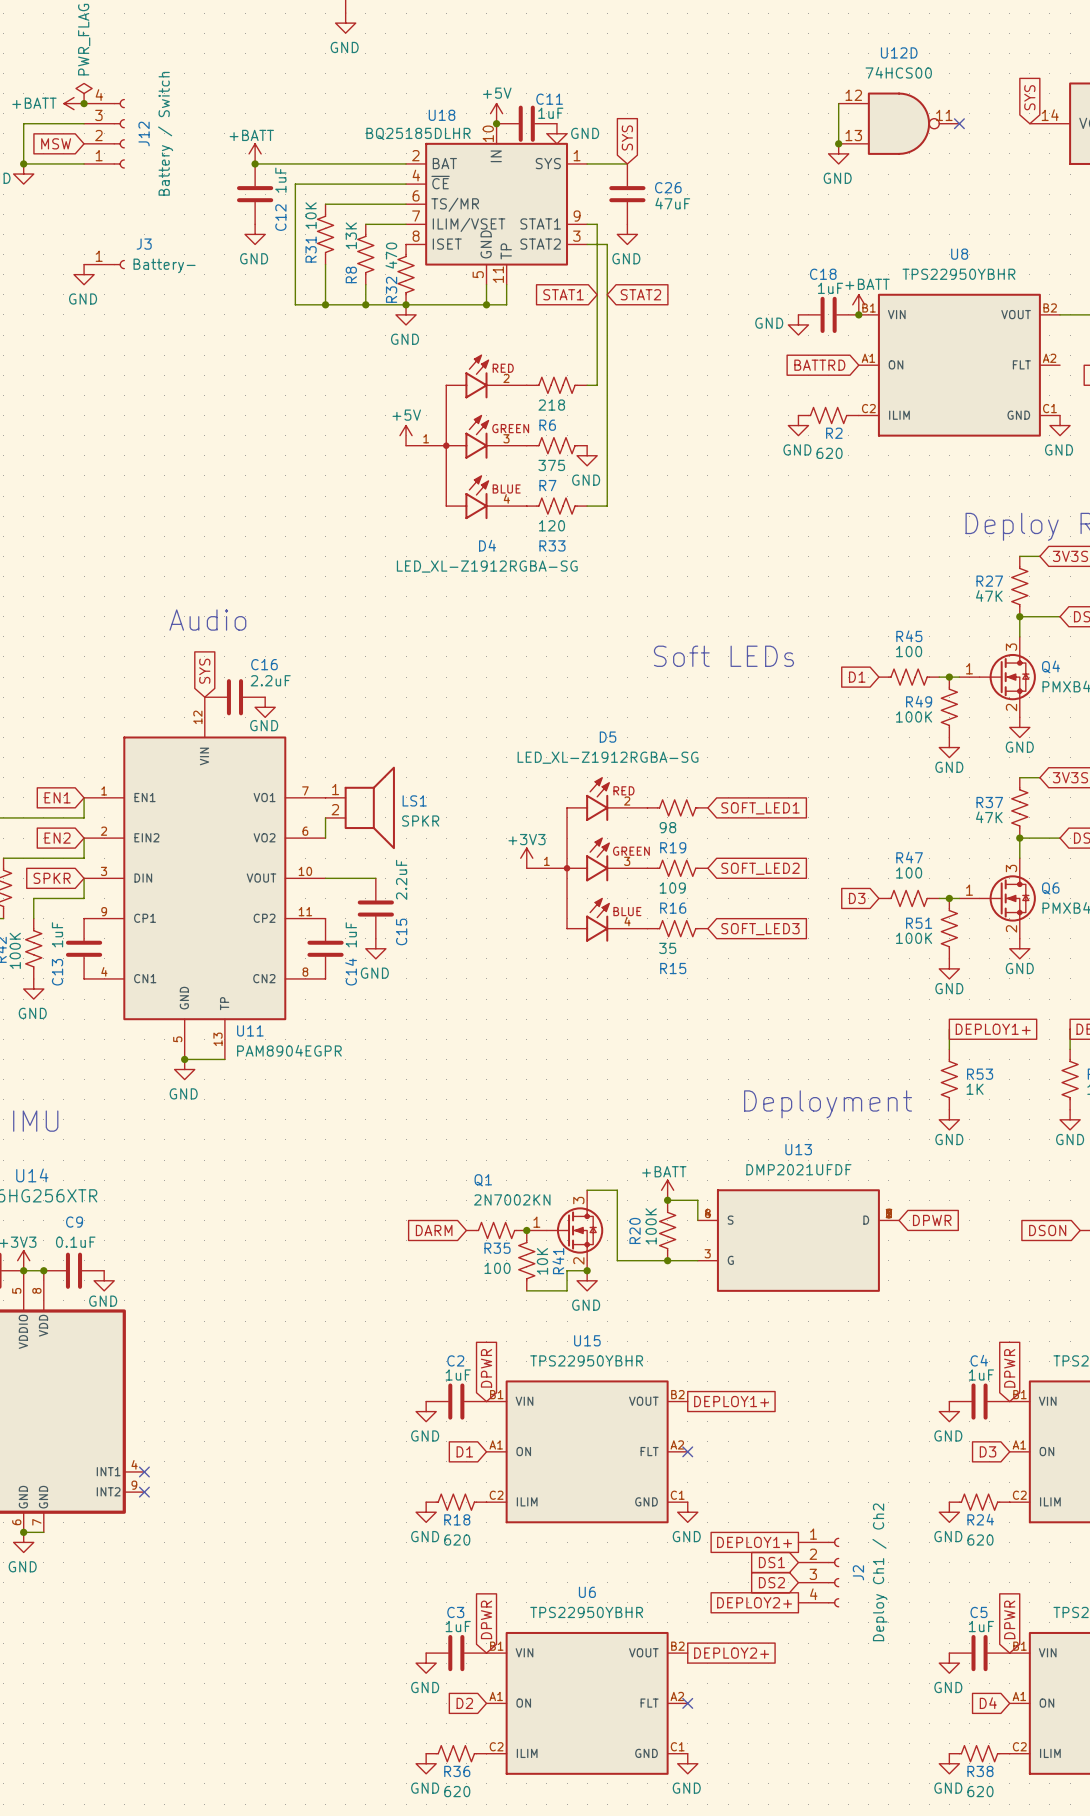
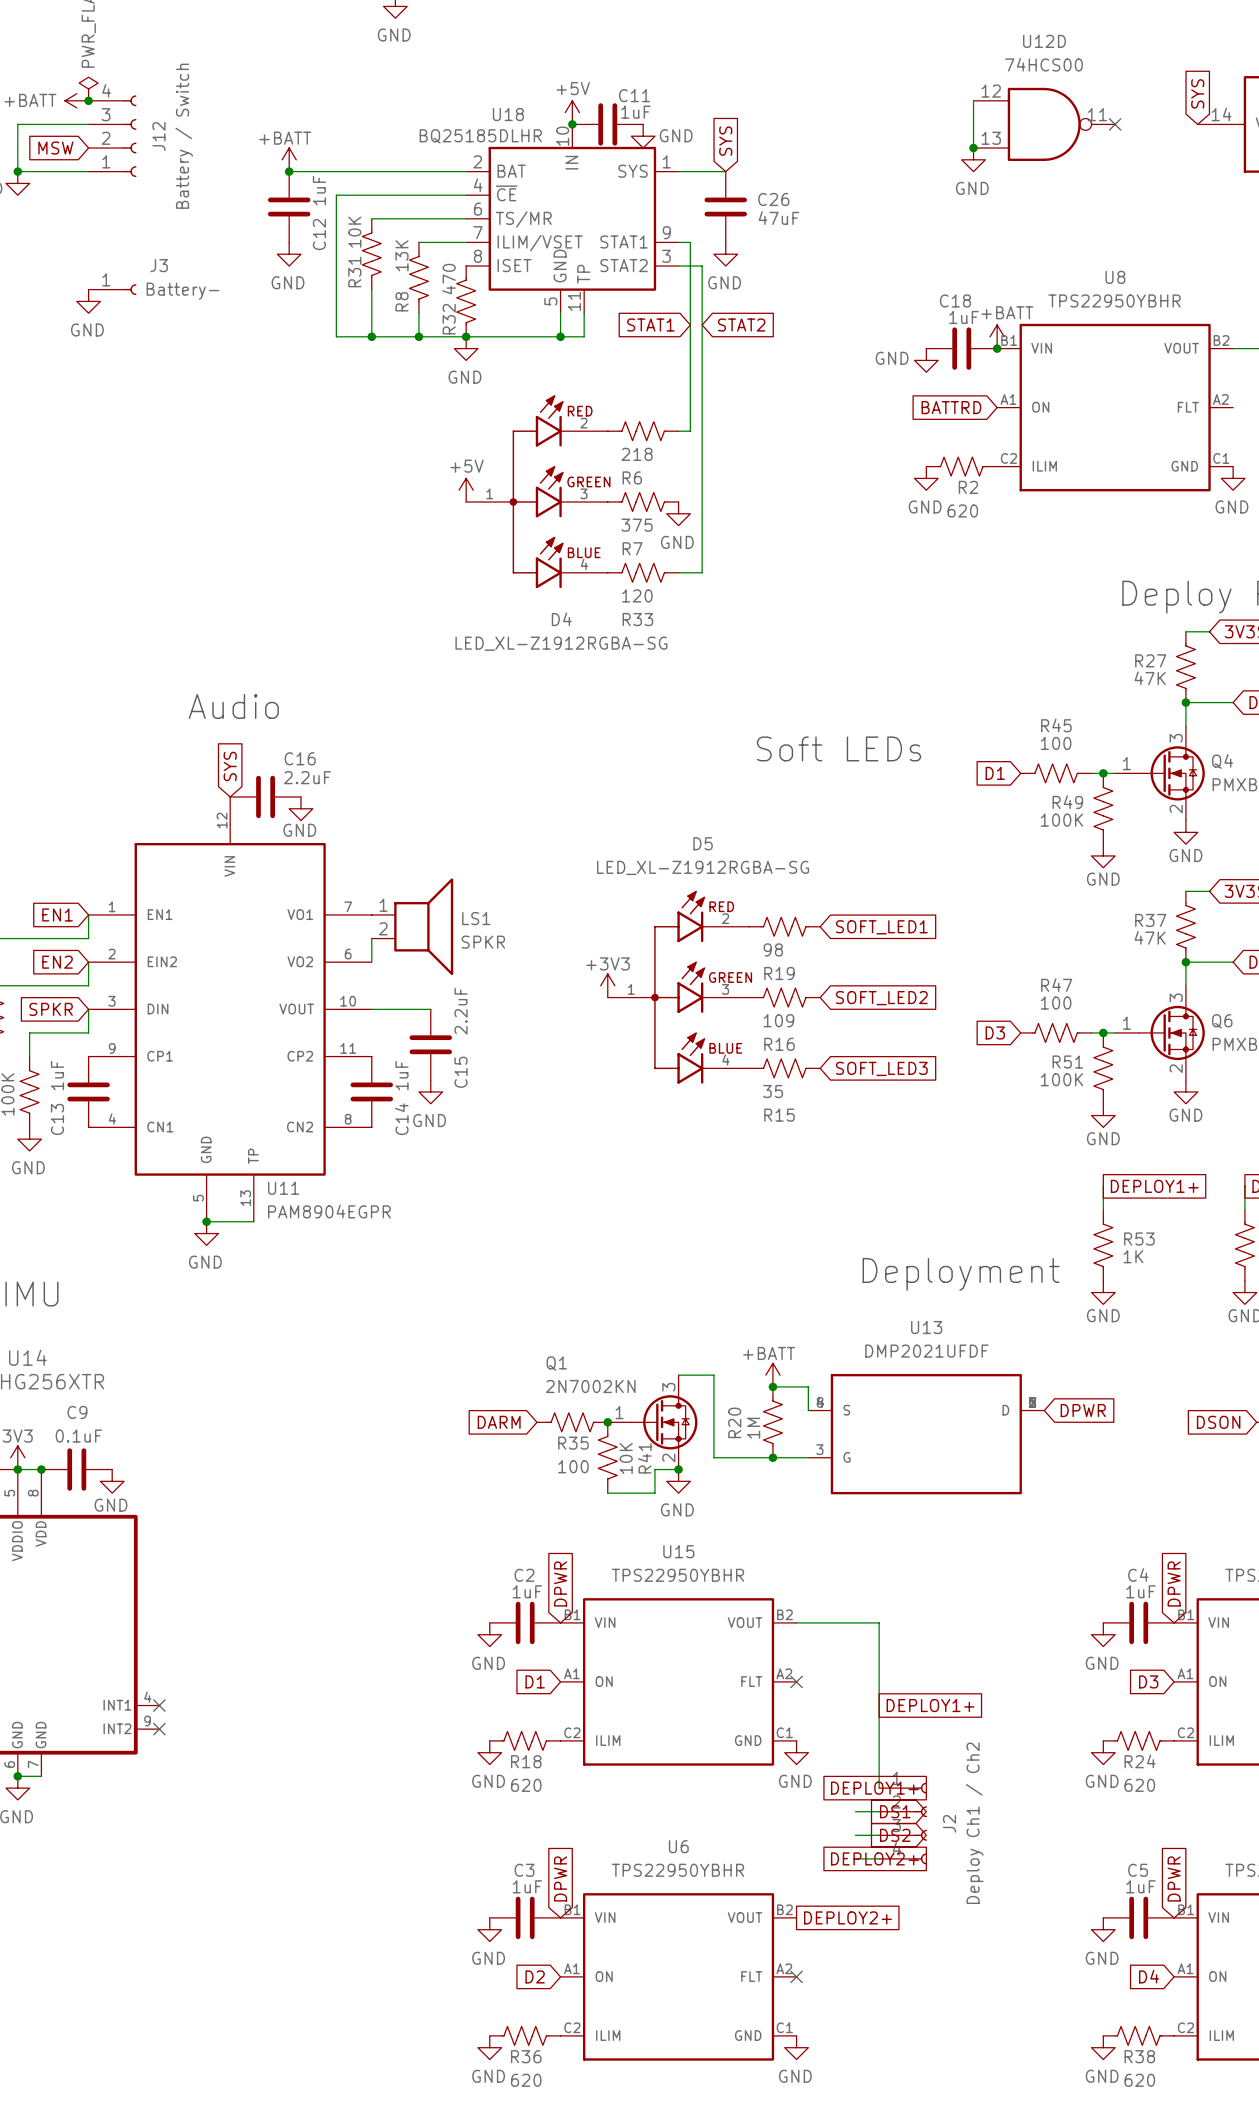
R20 value: 100K (651, 1226) -> 1M (753, 1428)
wire: none -> (796, 1622) (879, 1622) (879, 1788)
global label position: DEPLOY1+ (731, 1401) -> DEPLOY1+ (930, 1705)
wire: none -> (855, 1811) (879, 1811)
J2 position: (818, 1572) -> (903, 1823)
wire: none -> (855, 1835) (879, 1835)
wire: none -> (855, 1858) (879, 1858)

